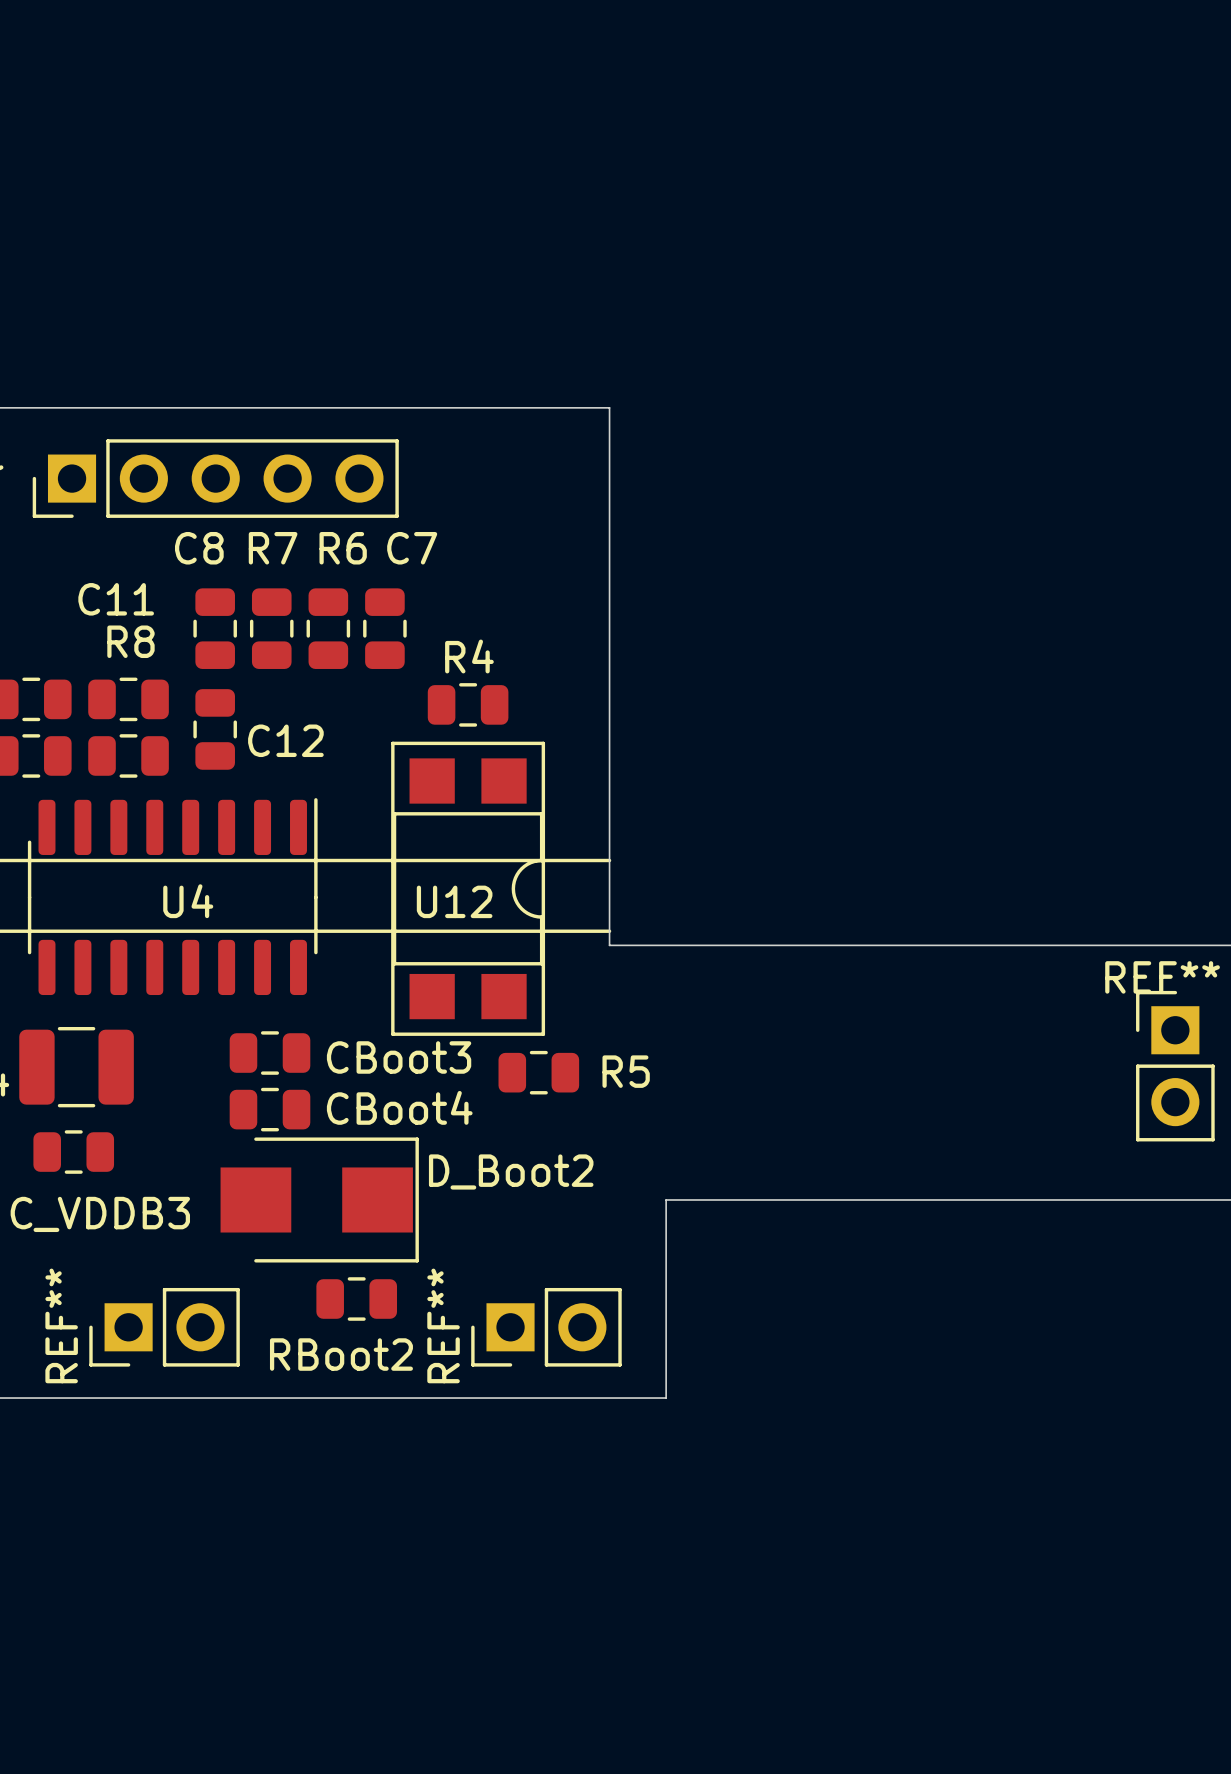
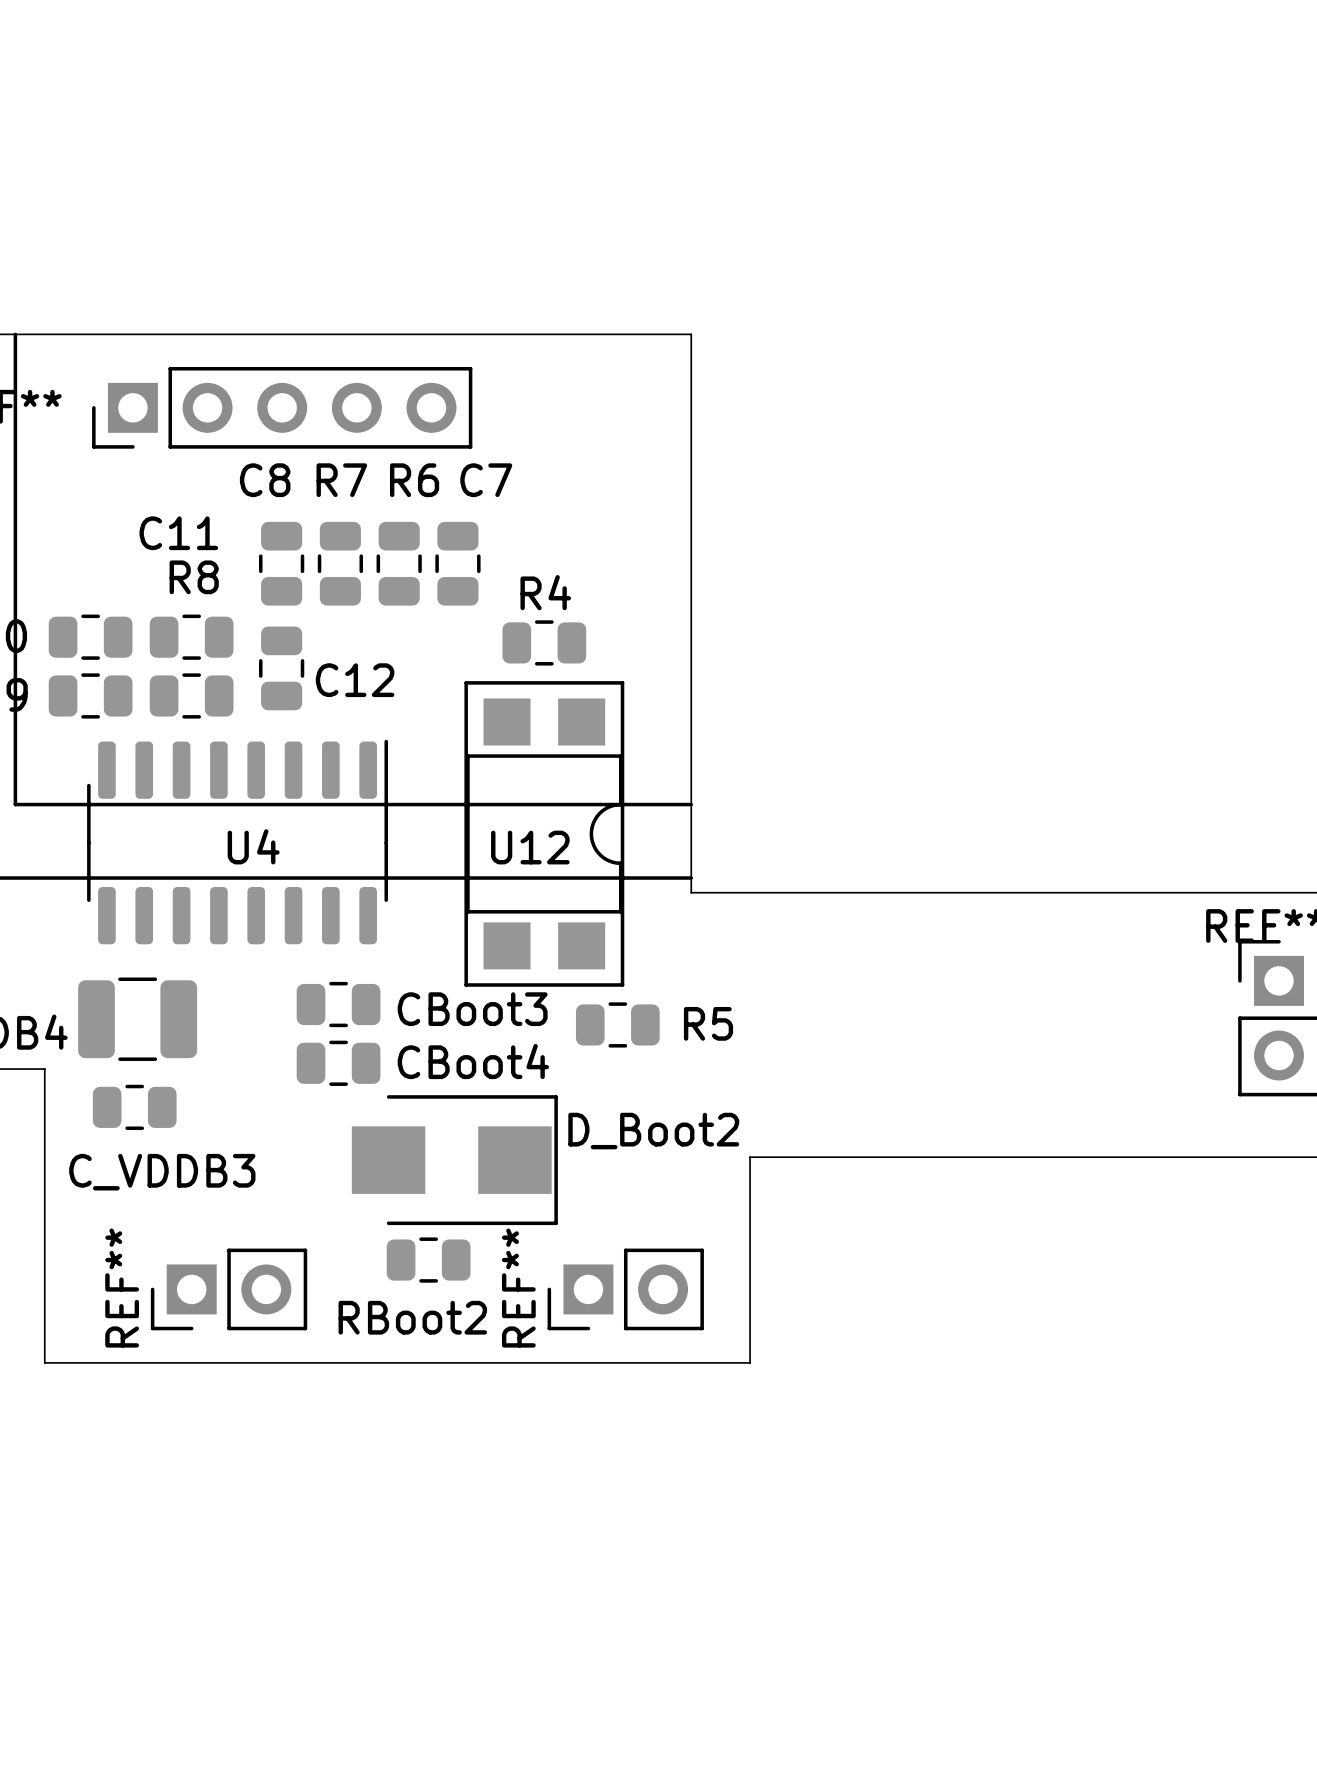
D_Boot2 position: (319, 1199) -> (454, 1160)

